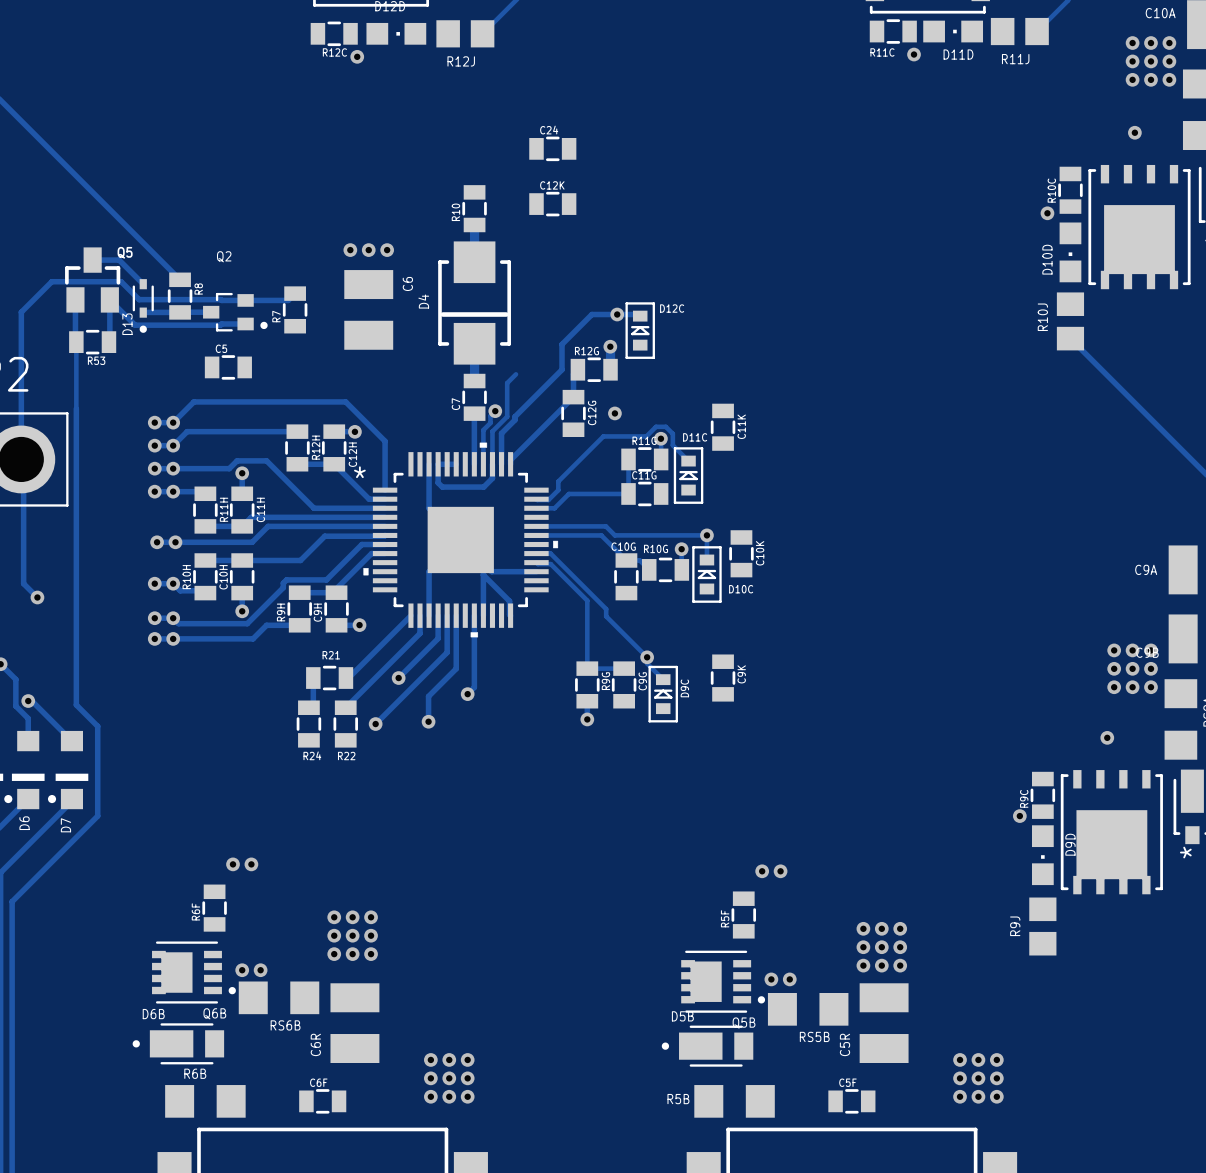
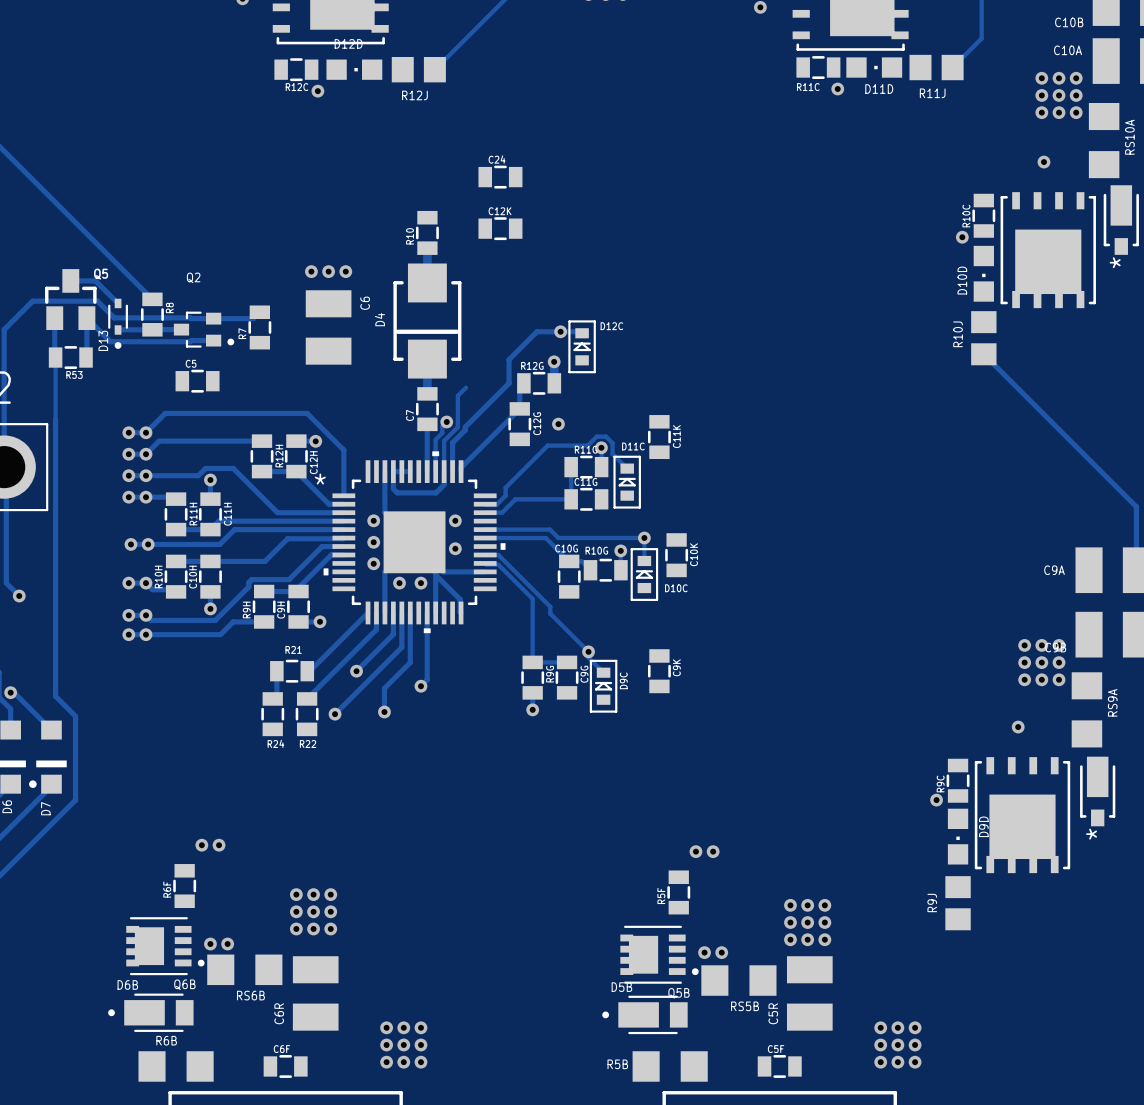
via: none -> (373, 520)
via: none -> (455, 520)
via: none -> (373, 542)
via: none -> (455, 548)
via: none -> (373, 563)
via: none -> (399, 583)
via: none -> (420, 583)

